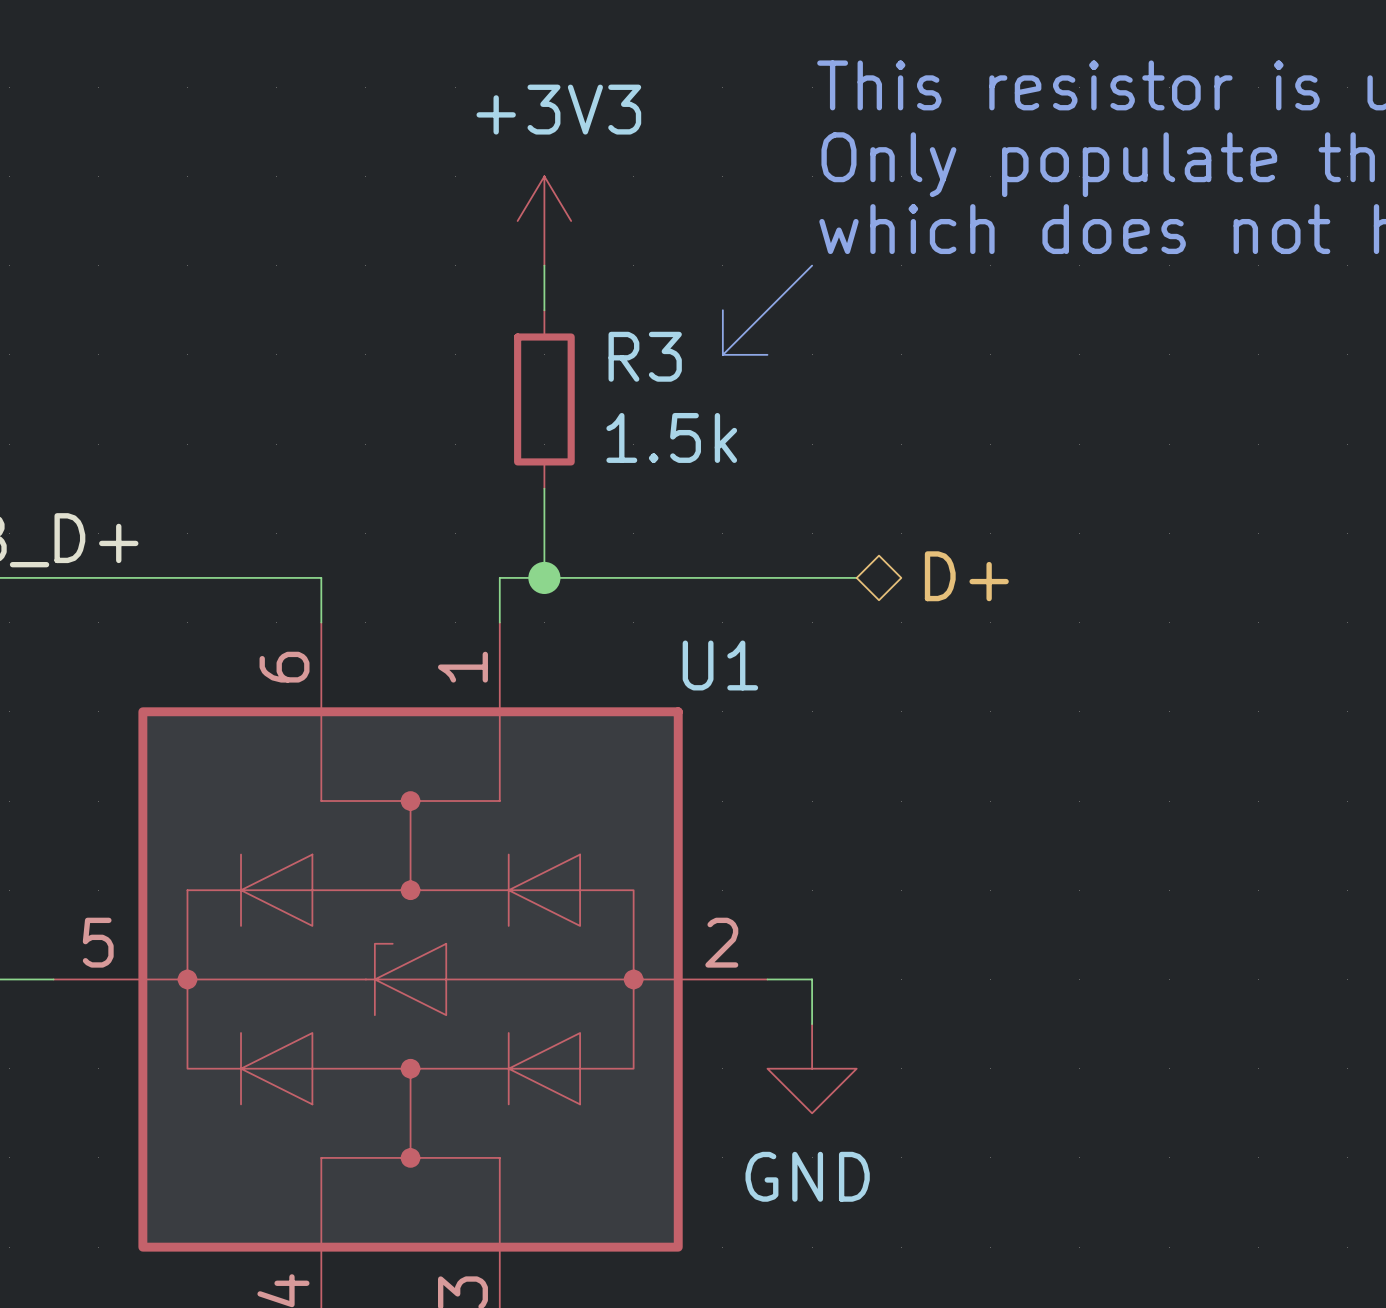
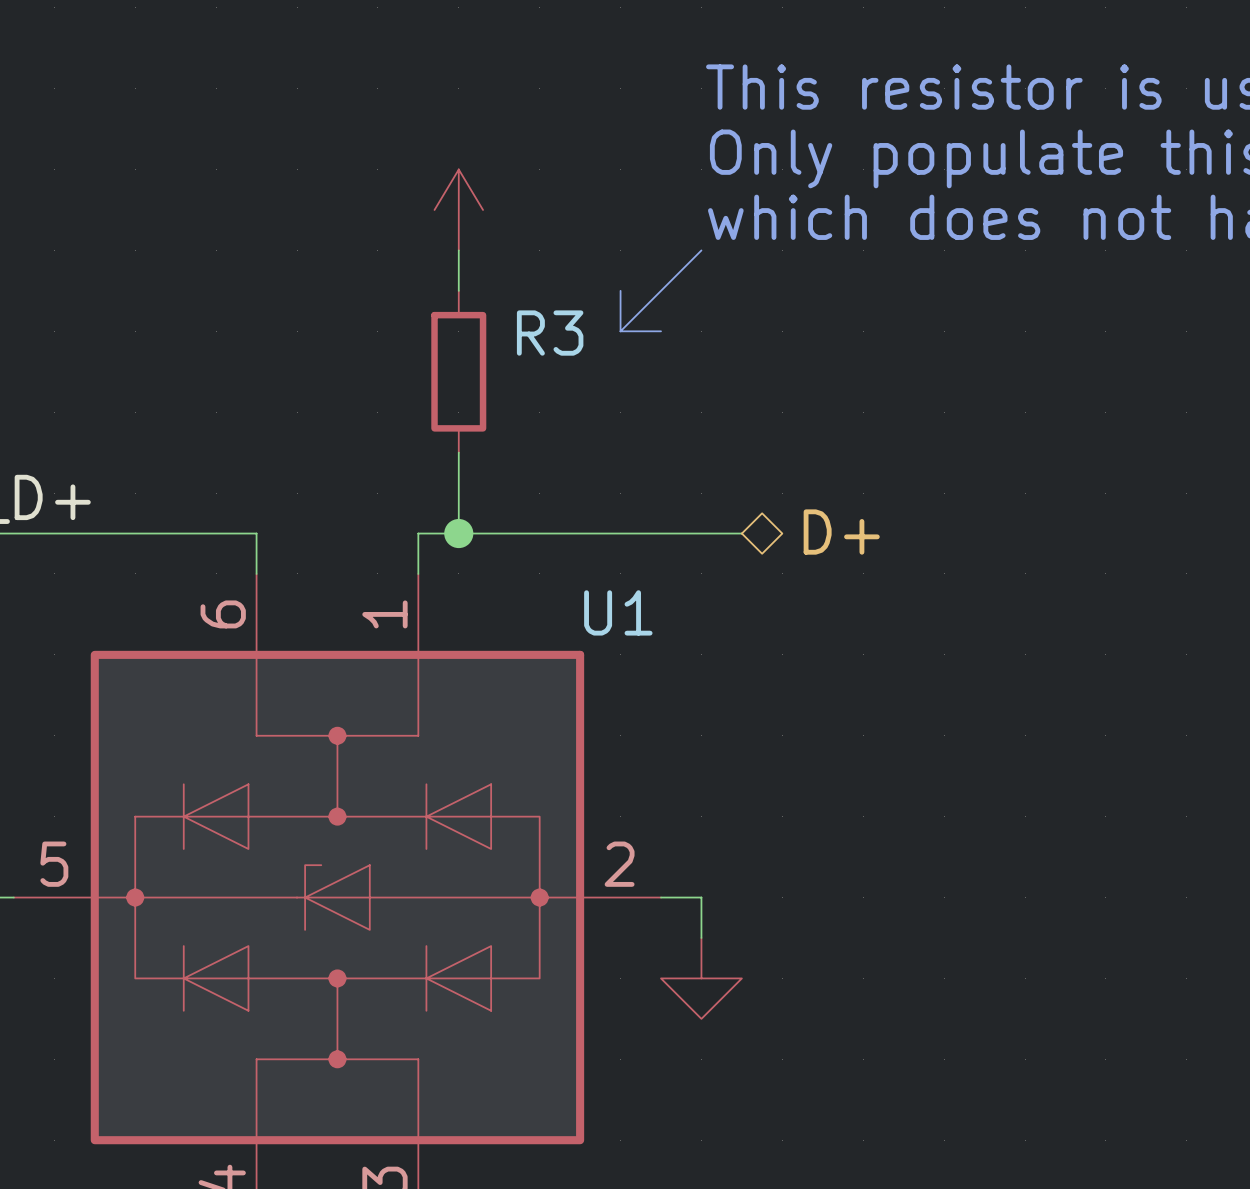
power symbol text: +3V3 (558, 109) -> none
R3 value: 1.5k (671, 437) -> none
power symbol text: GND (807, 1176) -> none

